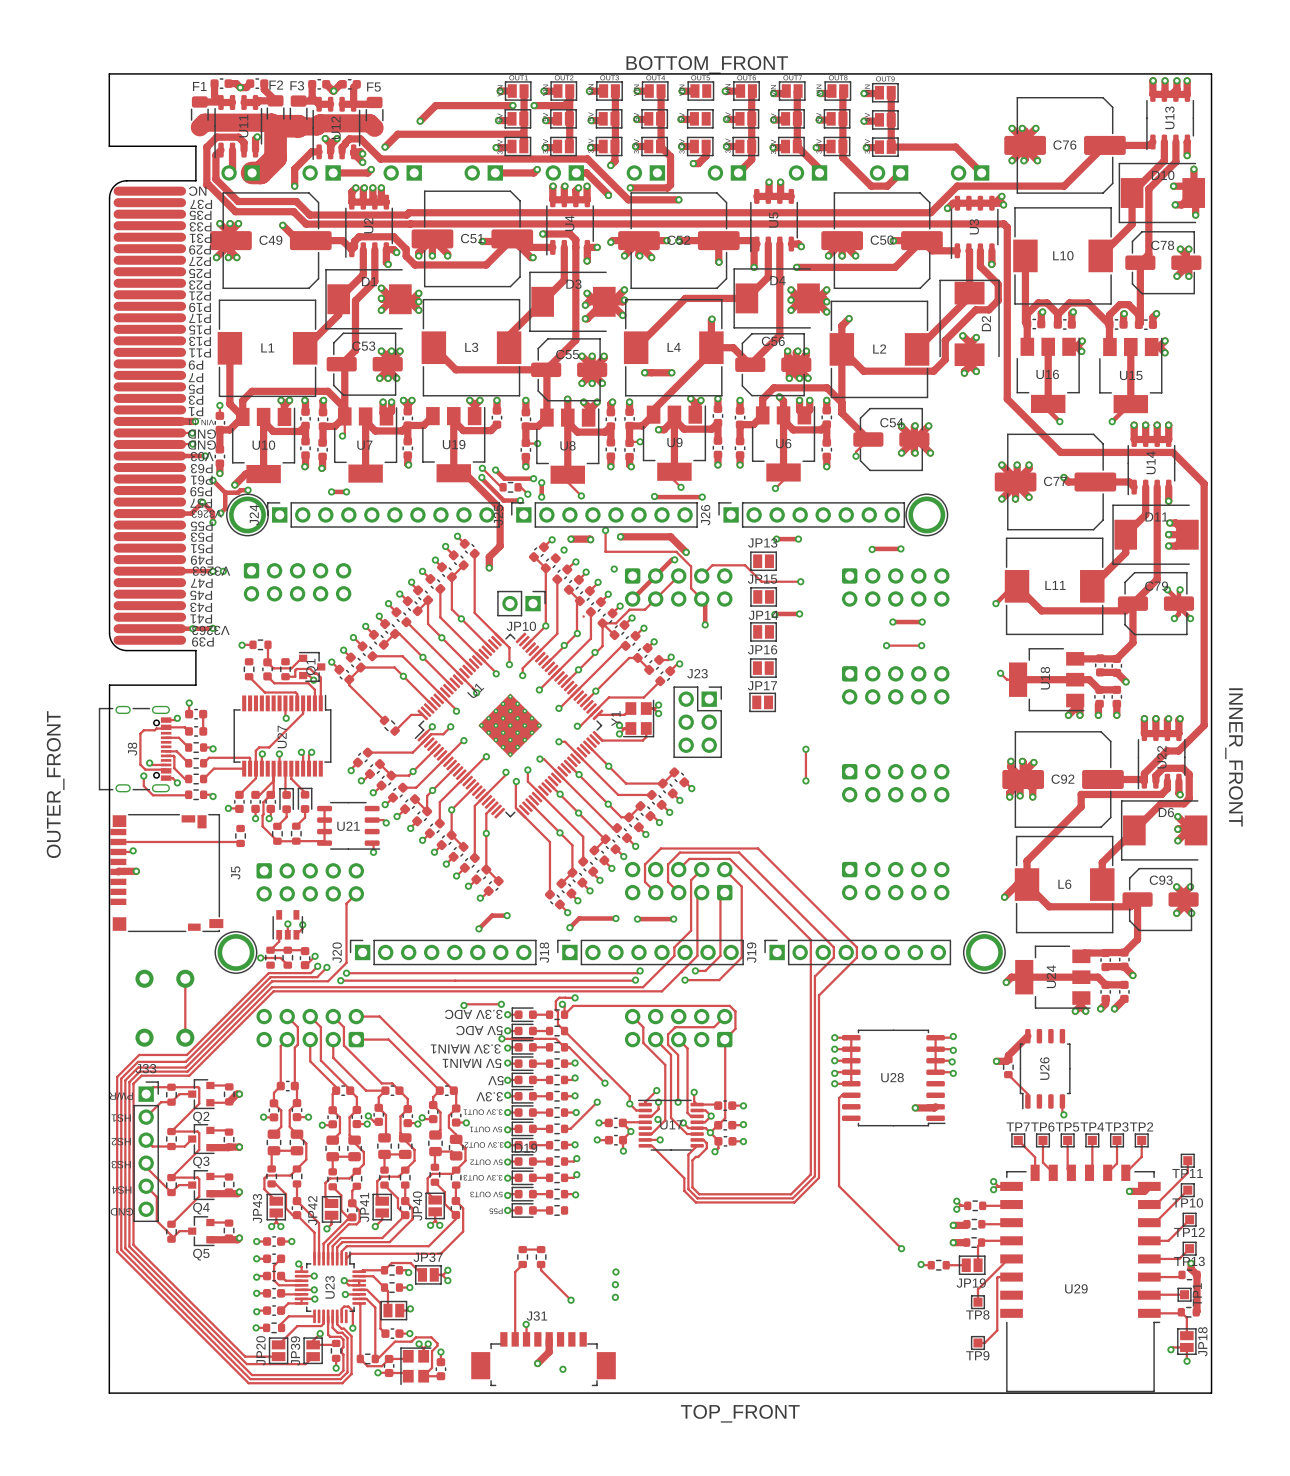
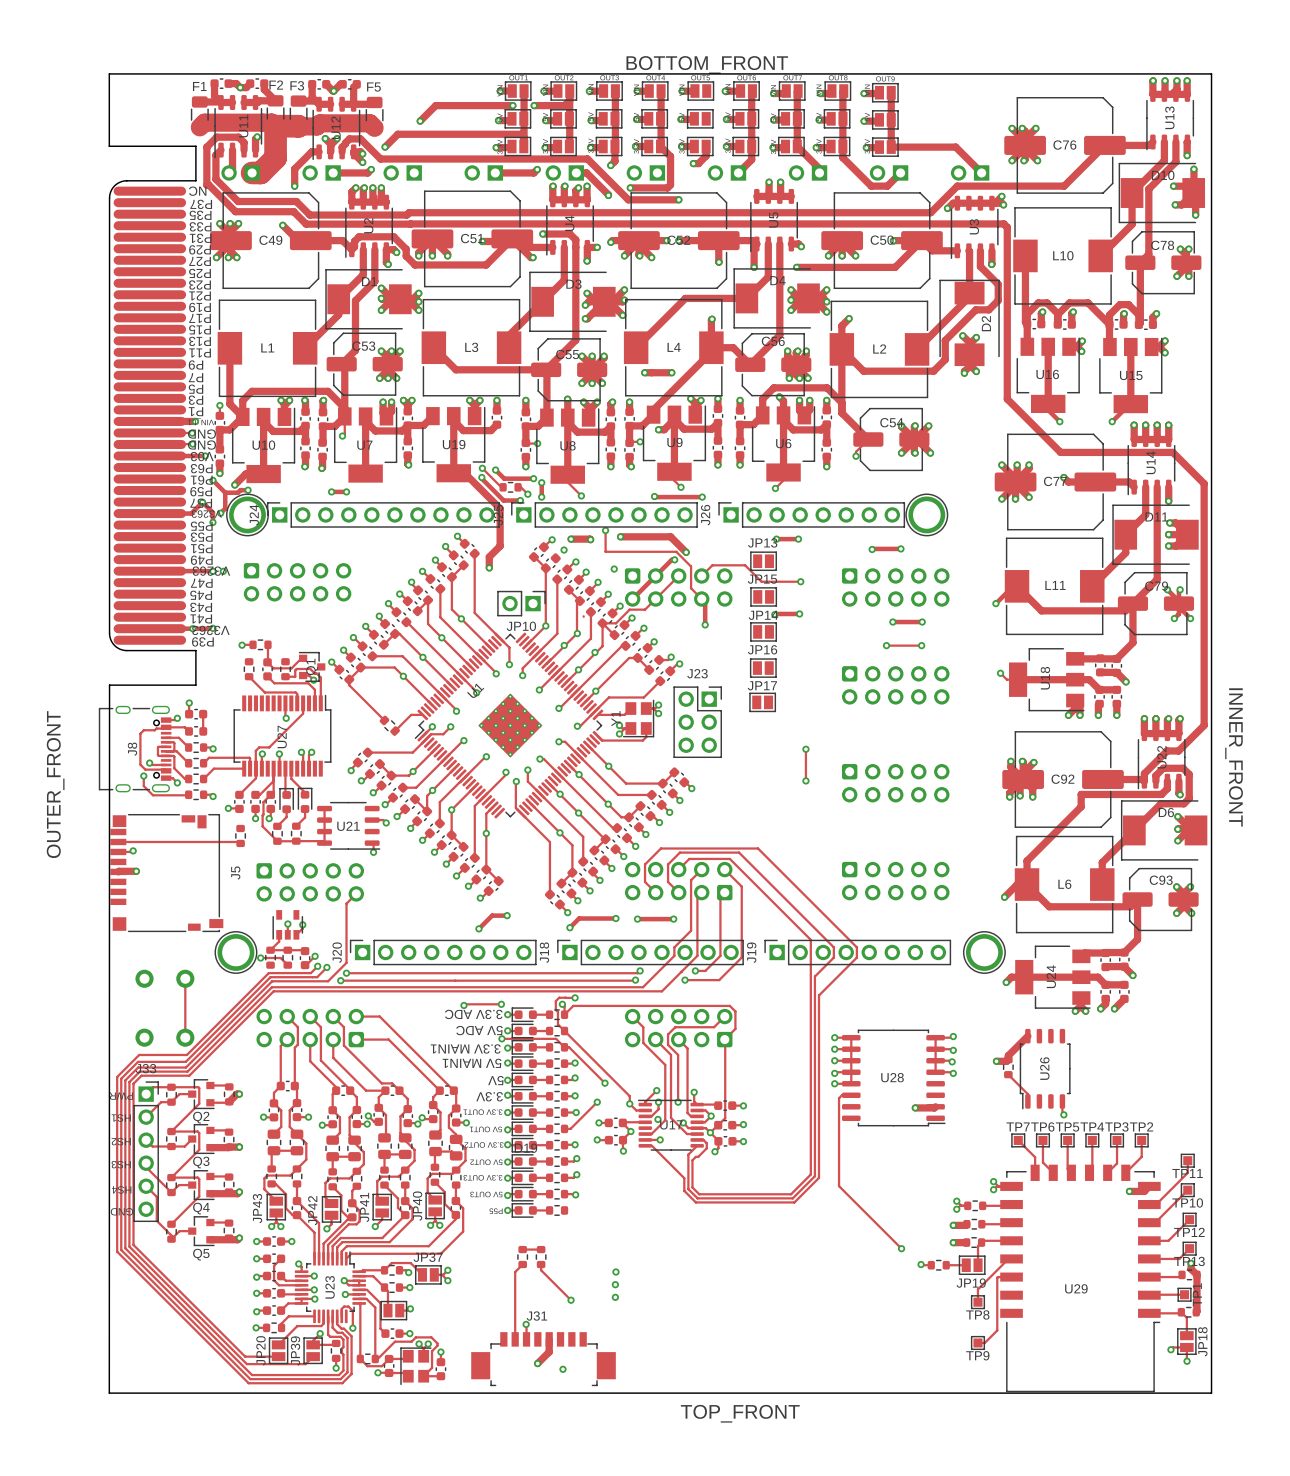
track: none -> (166, 742) (174, 743) (173, 751)
track: none -> (166, 746) (157, 747) (157, 755) (166, 755)

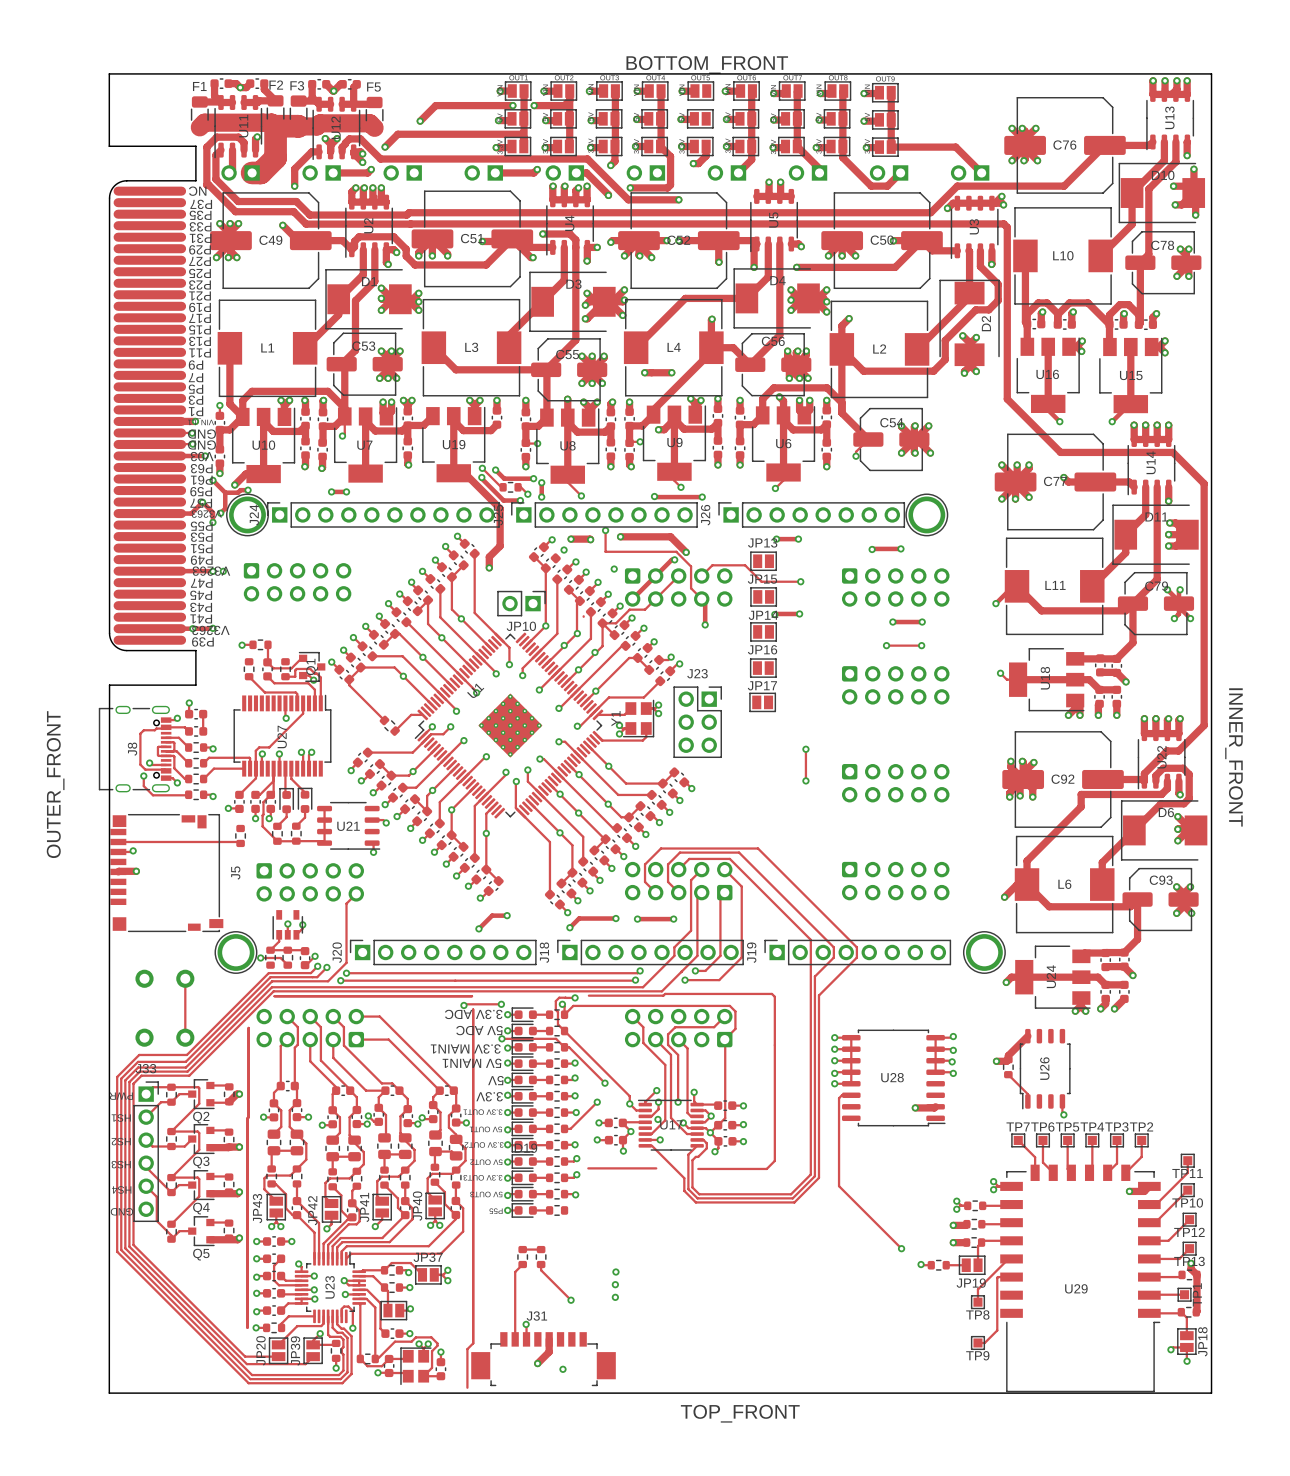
track: none -> (588, 995) (771, 993) (774, 996) (774, 1160) (766, 1168) (698, 1168)
track: none -> (274, 996) (472, 996)
track: none -> (473, 1009) (473, 1343) (467, 1349) (467, 1387)
track: none -> (248, 1027) (247, 1327)
track: none -> (588, 1168) (656, 1168)

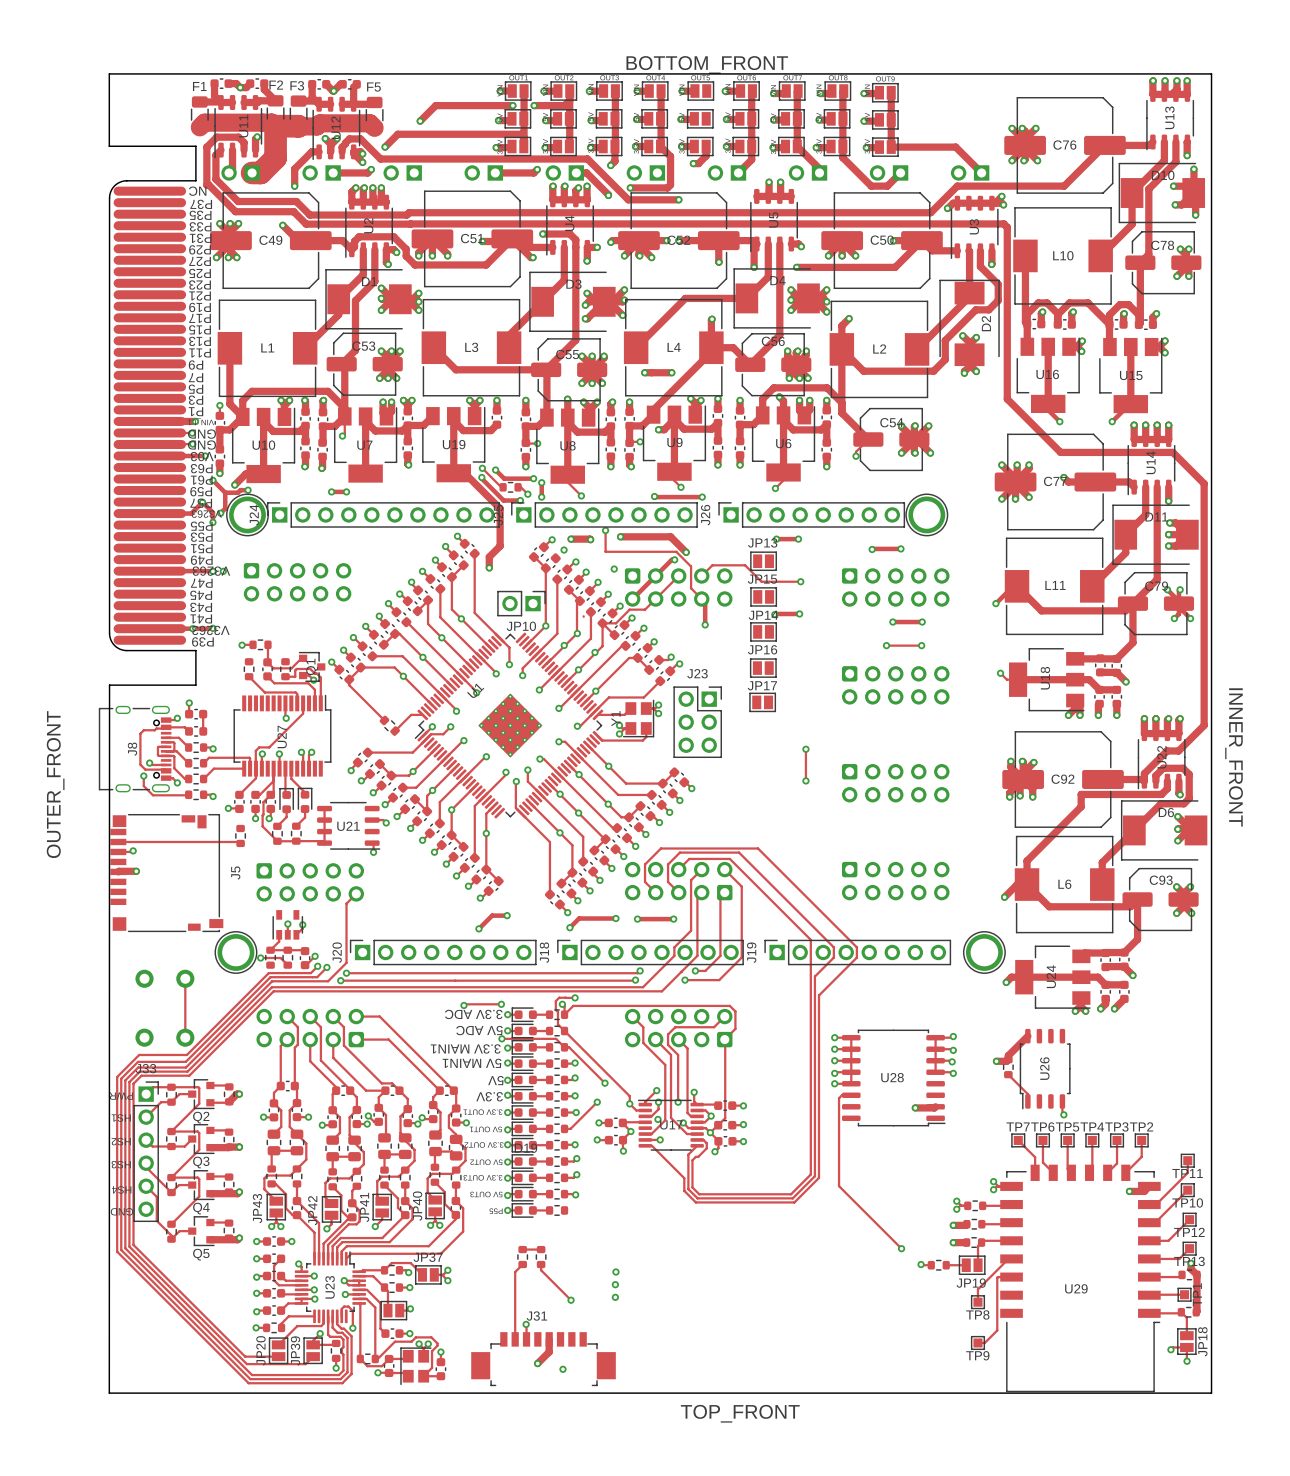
track: (588, 995) (771, 993) (774, 996) (774, 1160) (766, 1168) (698, 1168) -> none
track: (274, 996) (472, 996) -> none
track: (473, 1009) (473, 1343) (467, 1349) (467, 1387) -> none
track: (248, 1027) (247, 1327) -> none
track: (588, 1168) (656, 1168) -> none

